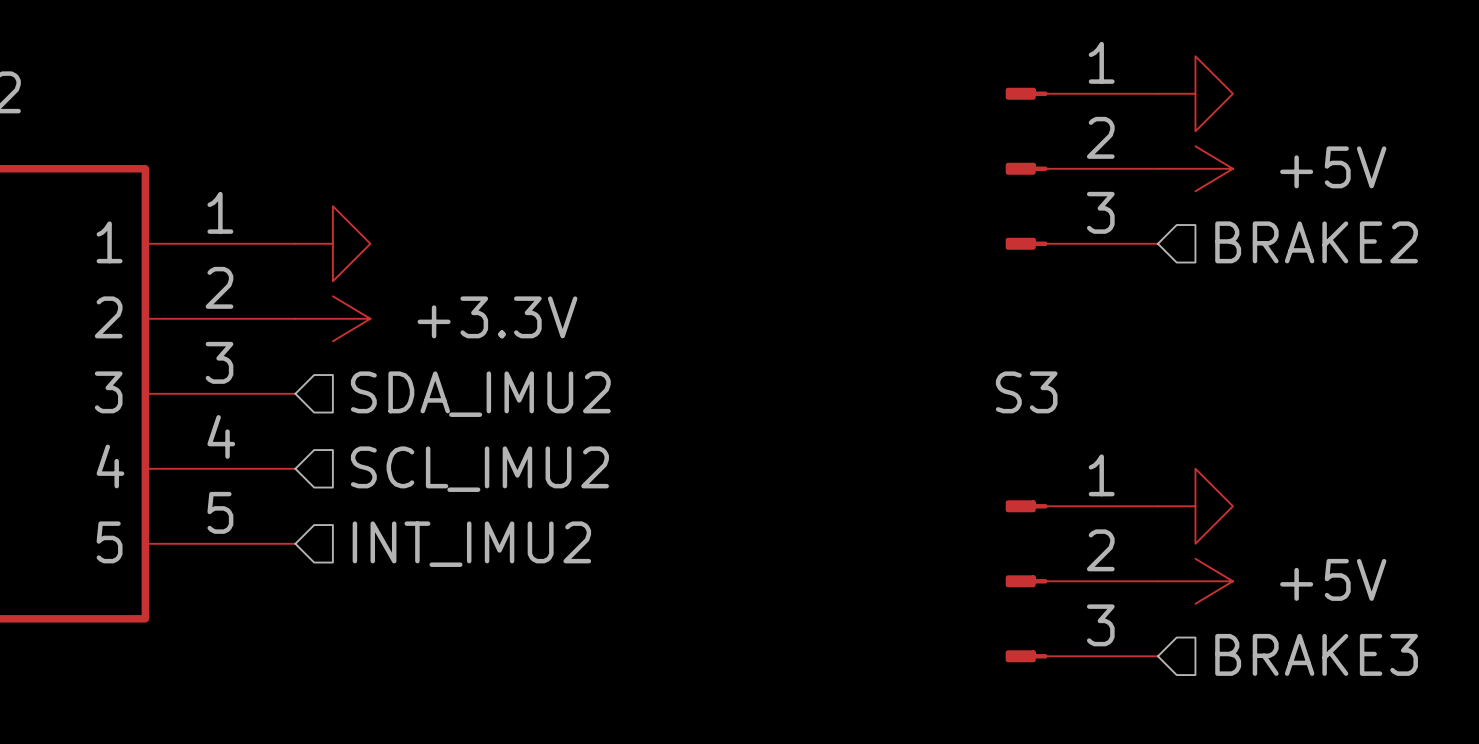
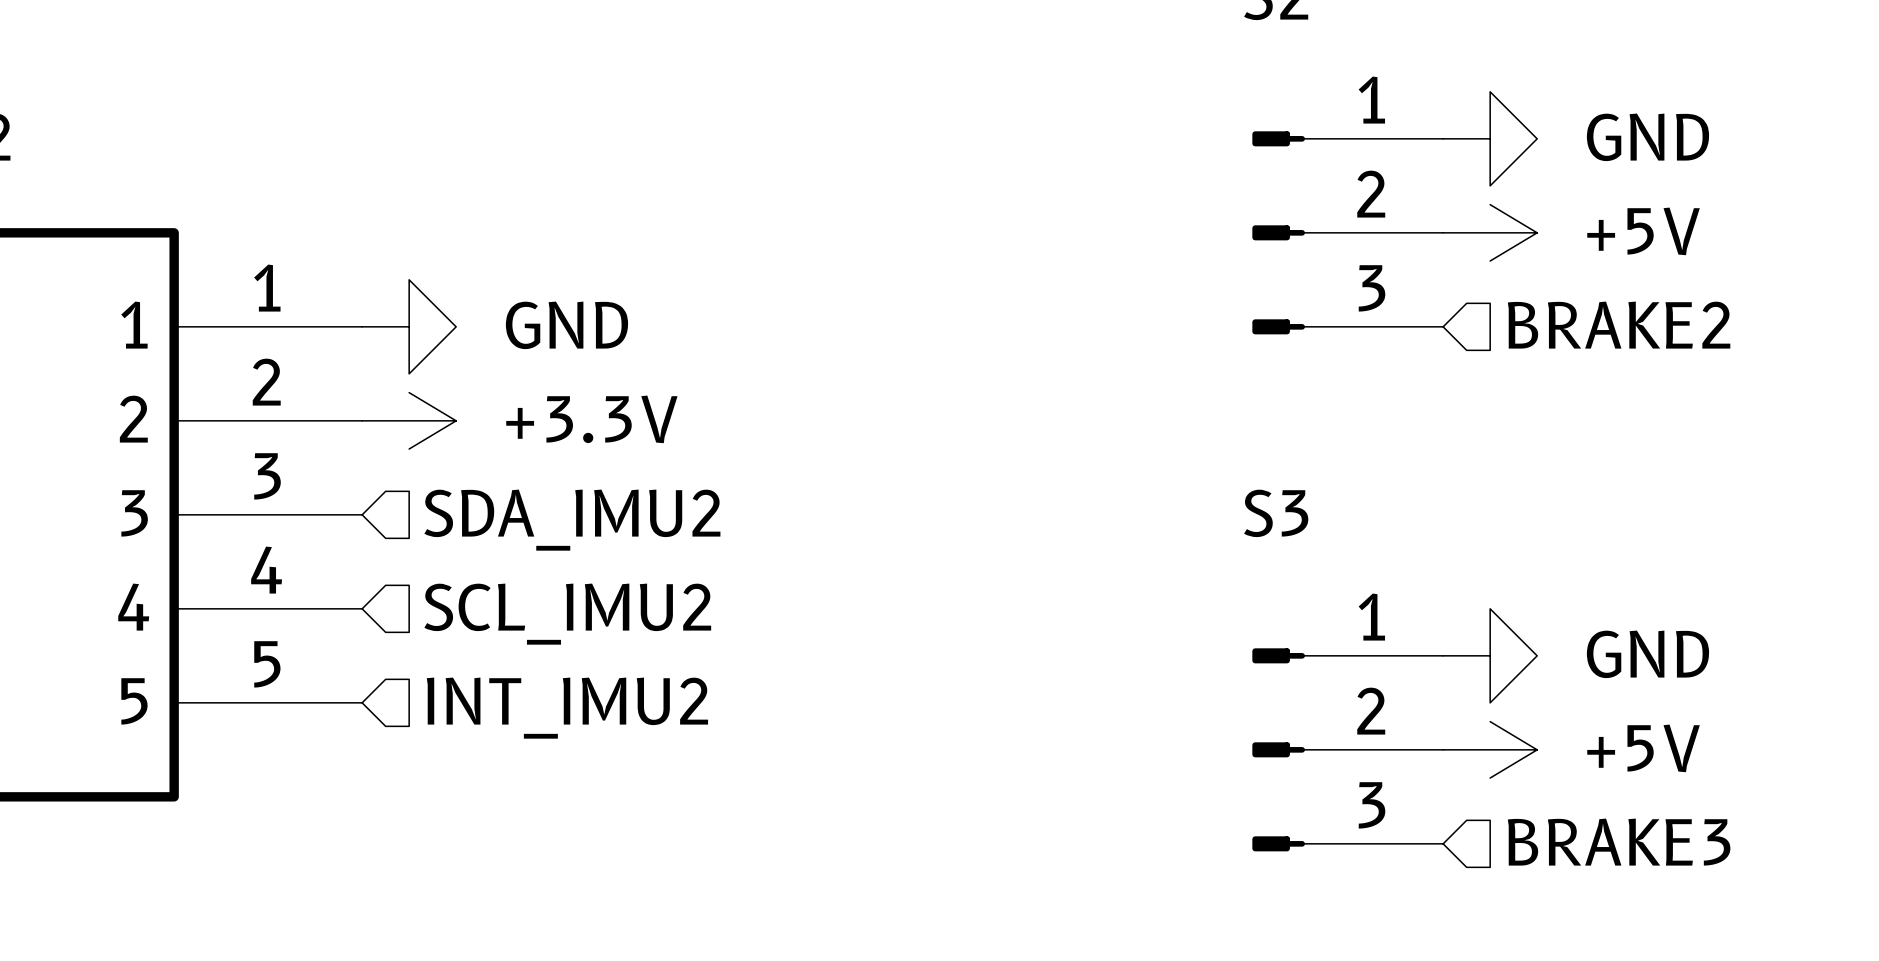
power symbol text: none -> GND (1647, 137)
power symbol text: none -> GND (566, 325)
power symbol text: none -> GND (1647, 654)

